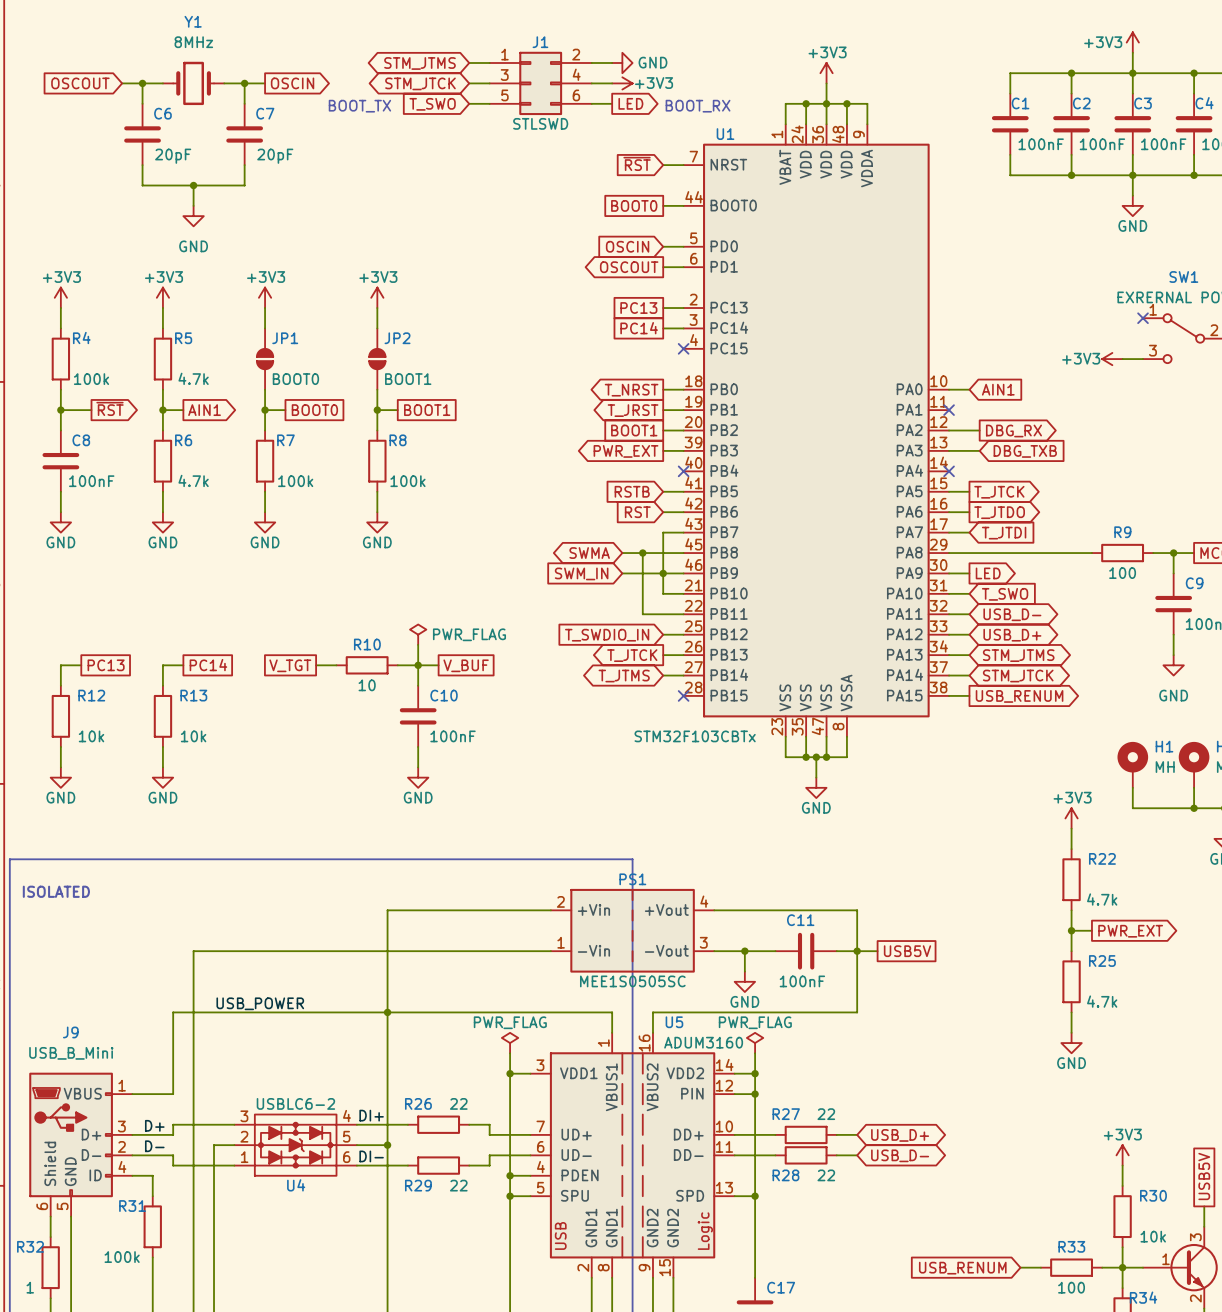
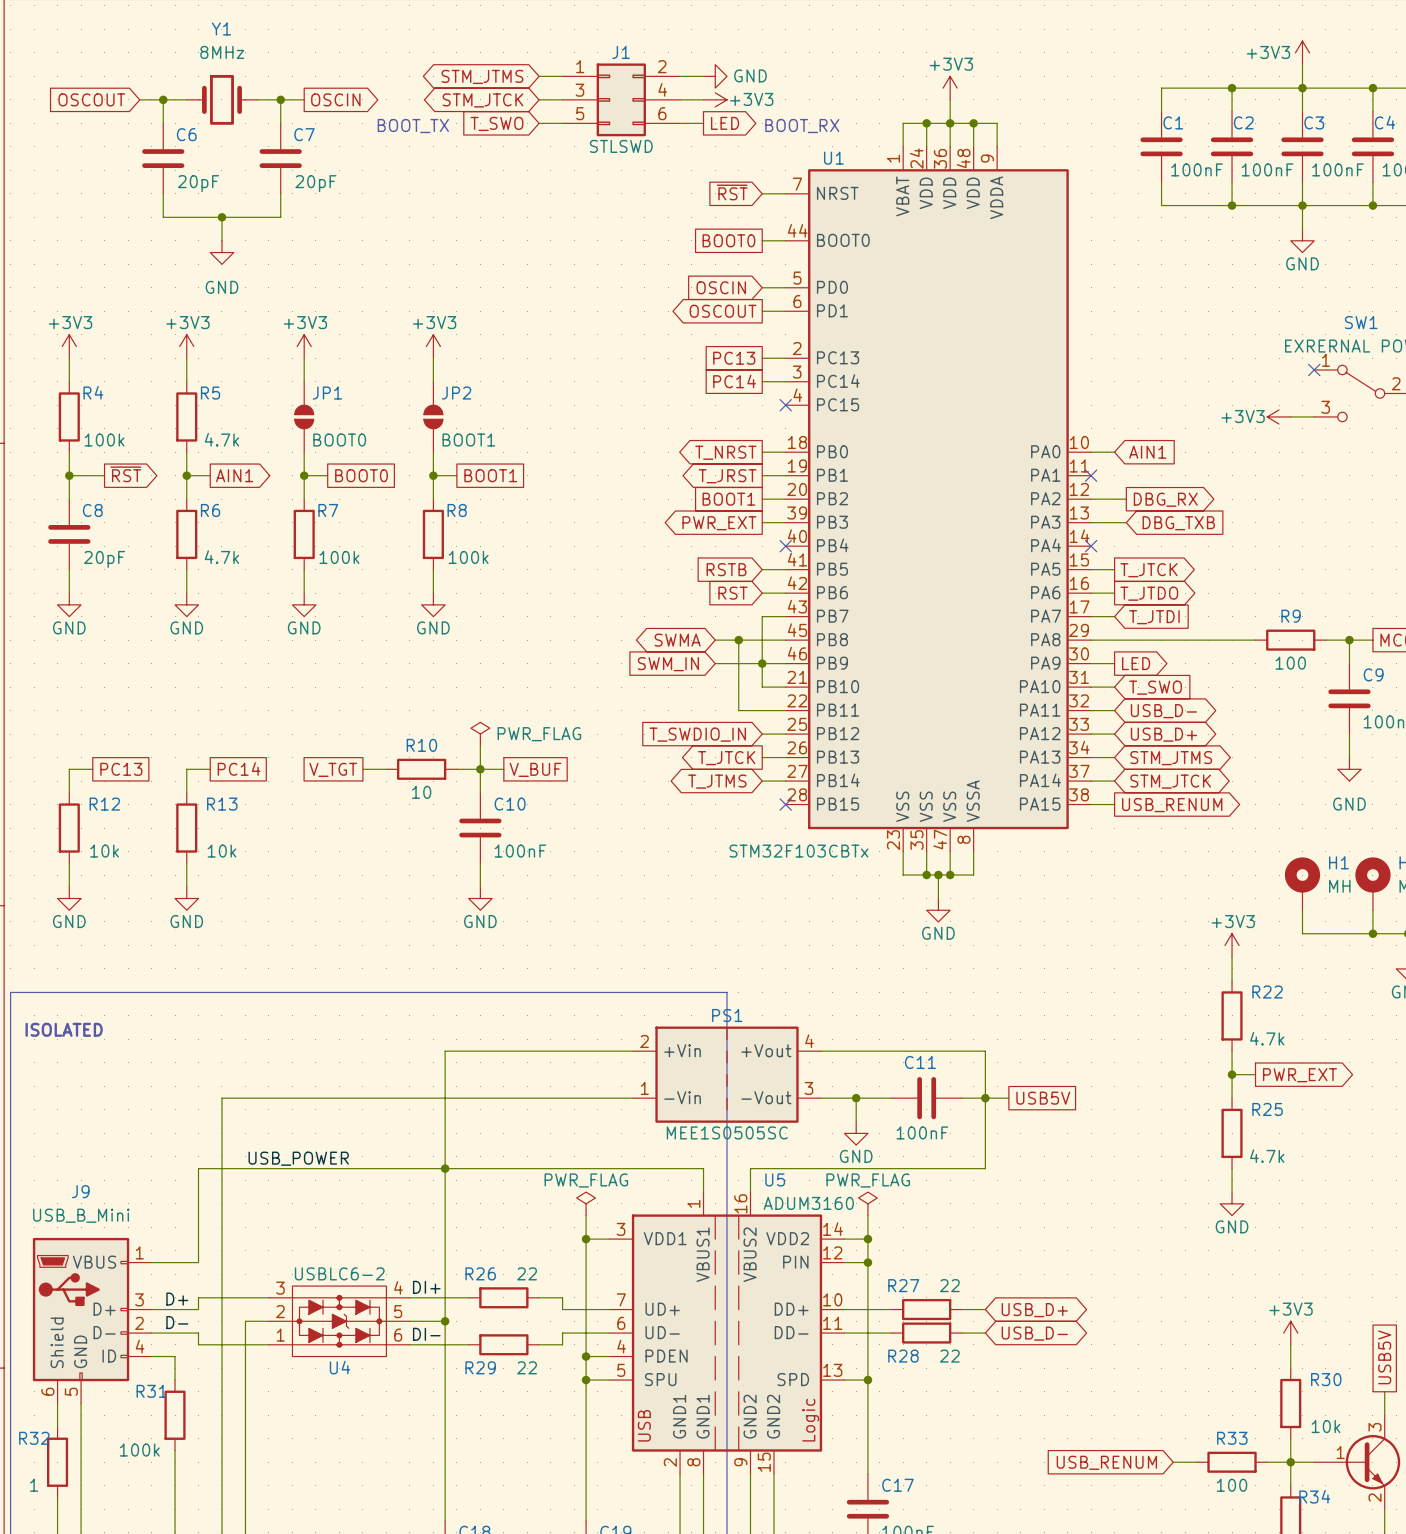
C8 value: 100nF (91, 481) -> 20pF (104, 559)

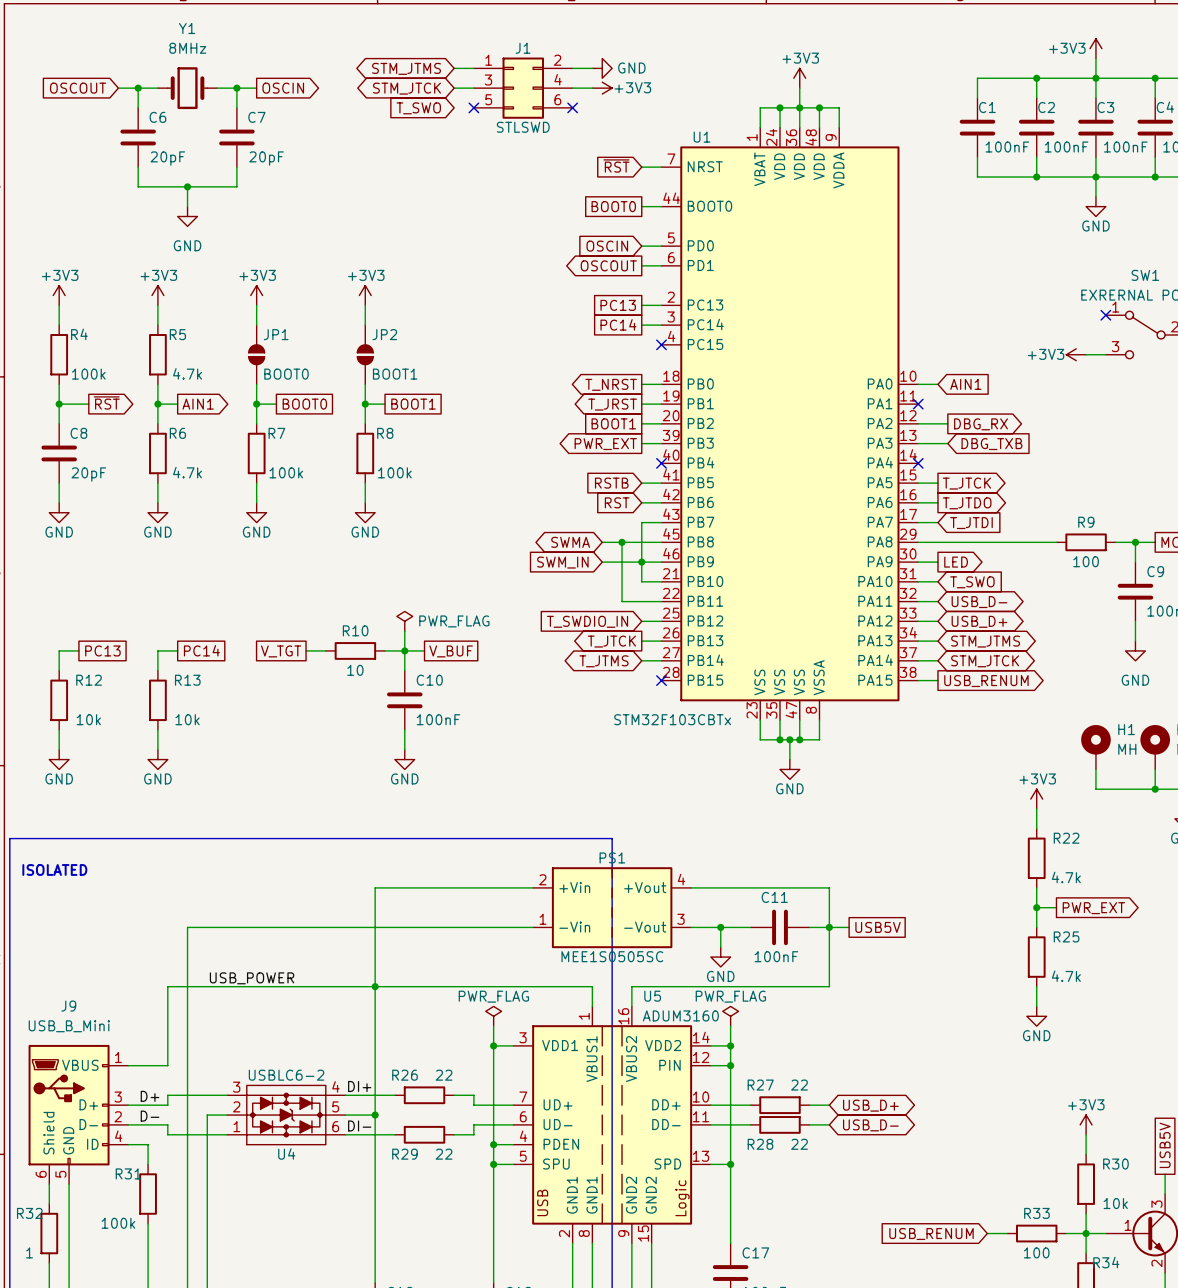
wire: (539, 123) (562, 123) -> none
no-connect mark: none -> (473, 107)
wire: (680, 123) (703, 123) -> none
no-connect mark: none -> (572, 107)
global label: LED (725, 123) -> none
text: BOOT_TX (413, 126) -> none
text: BOOT_RX (802, 126) -> none

